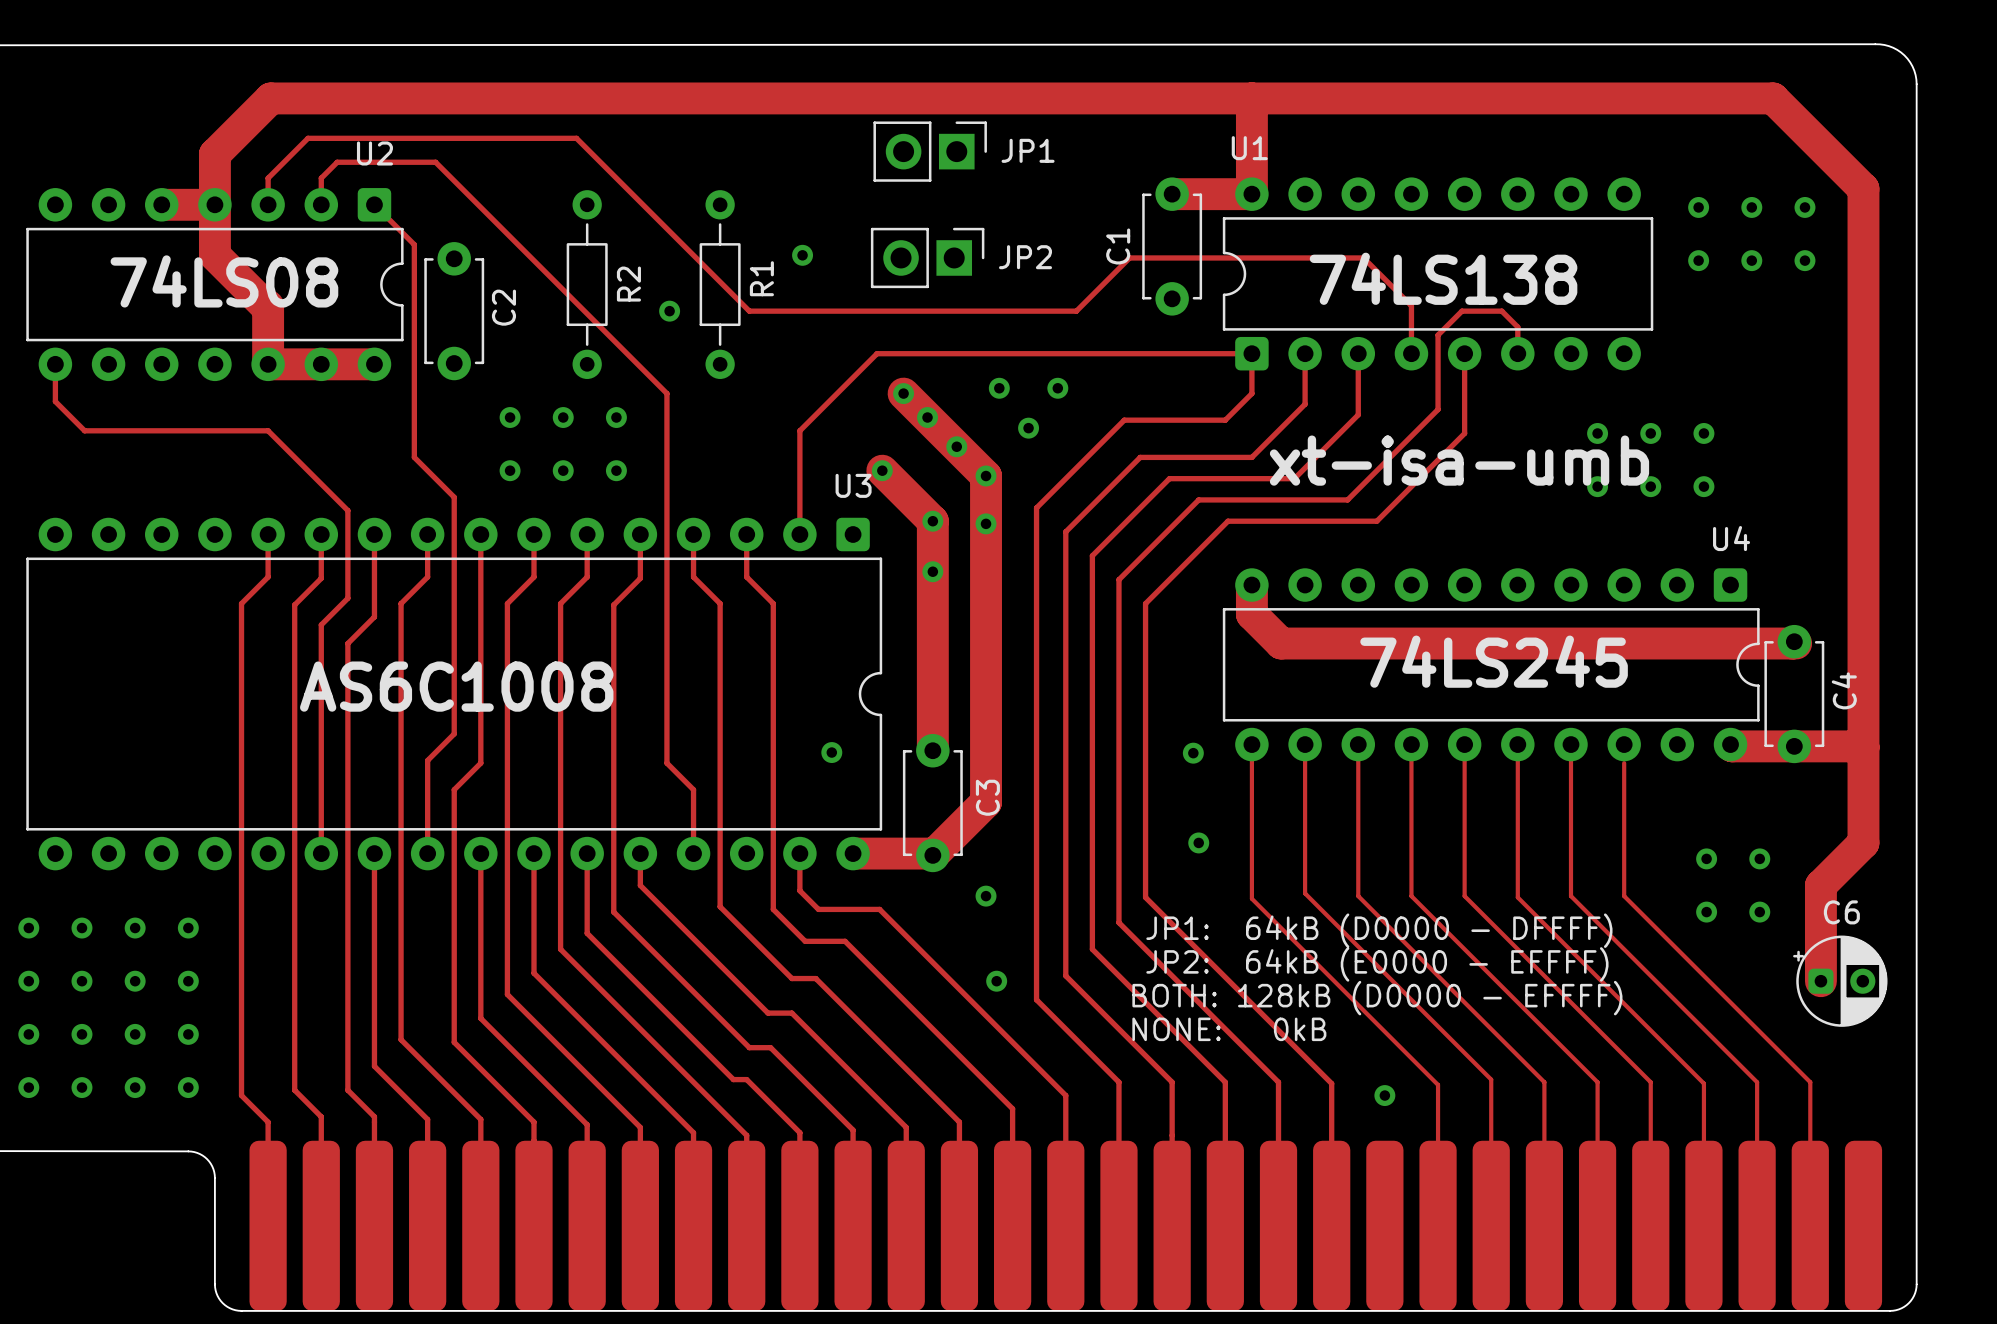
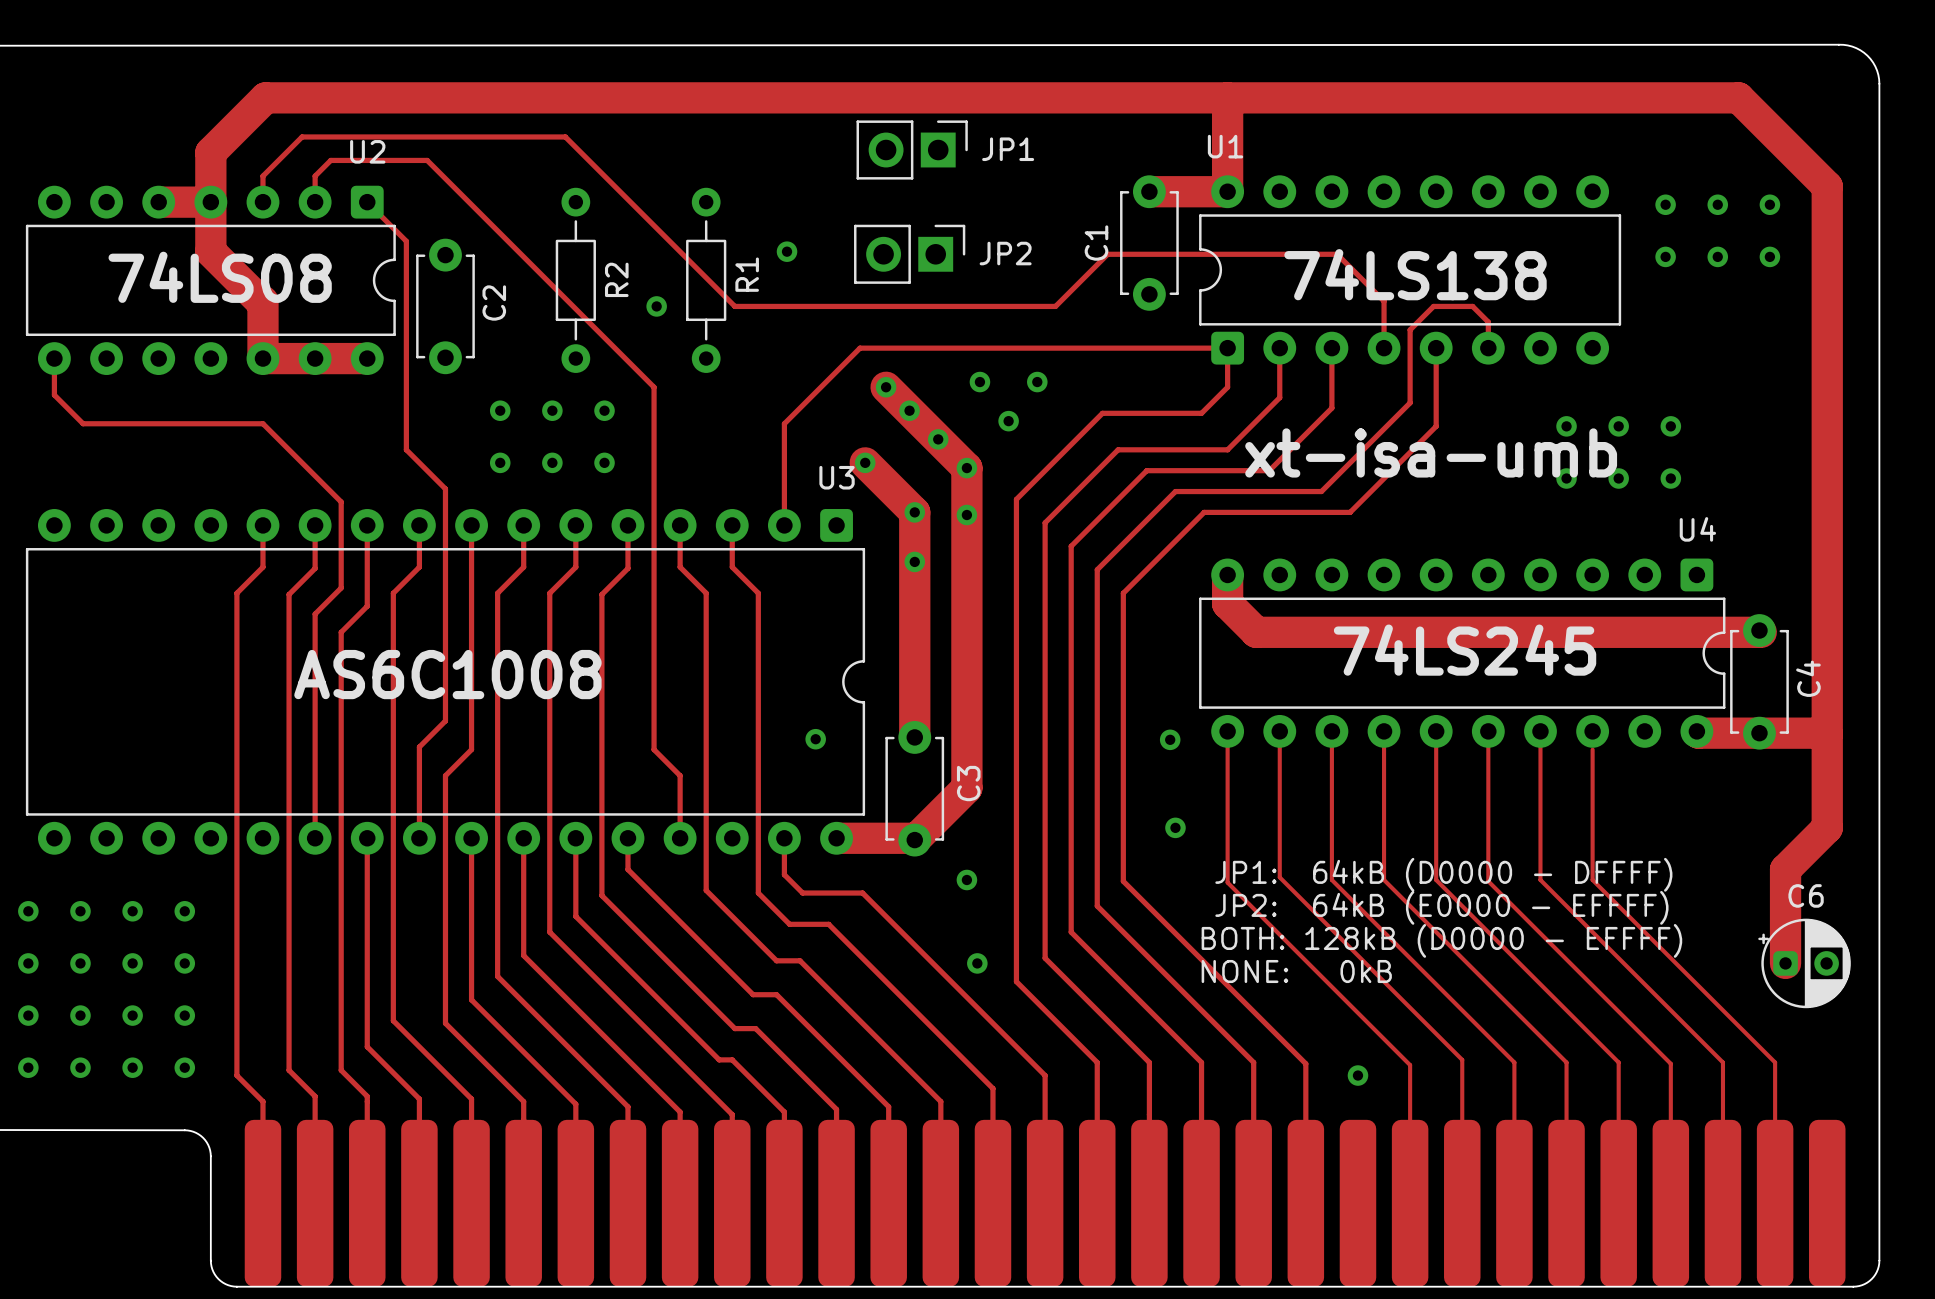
via: (1706, 858) -> none
via: (1759, 858) -> none
via: (1706, 912) -> none
via: (1759, 912) -> none
text position: JP1: 64kB (D0000 - DFFFF) (1379, 930) -> JP1: 64kB (D0000 - DFFFF) (1443, 874)
text position: JP2: 64kB (E0000 - EFFFF) (1377, 964) -> JP2: 64kB (E0000 - EFFFF) (1441, 907)
text position: BOTH: 128kB (D0000 - EFFFF) (1377, 998) -> BOTH: 128kB (D0000 - EFFFF) (1441, 940)
text position: NONE: 0kB (1229, 1029) -> NONE: 0kB (1296, 971)

